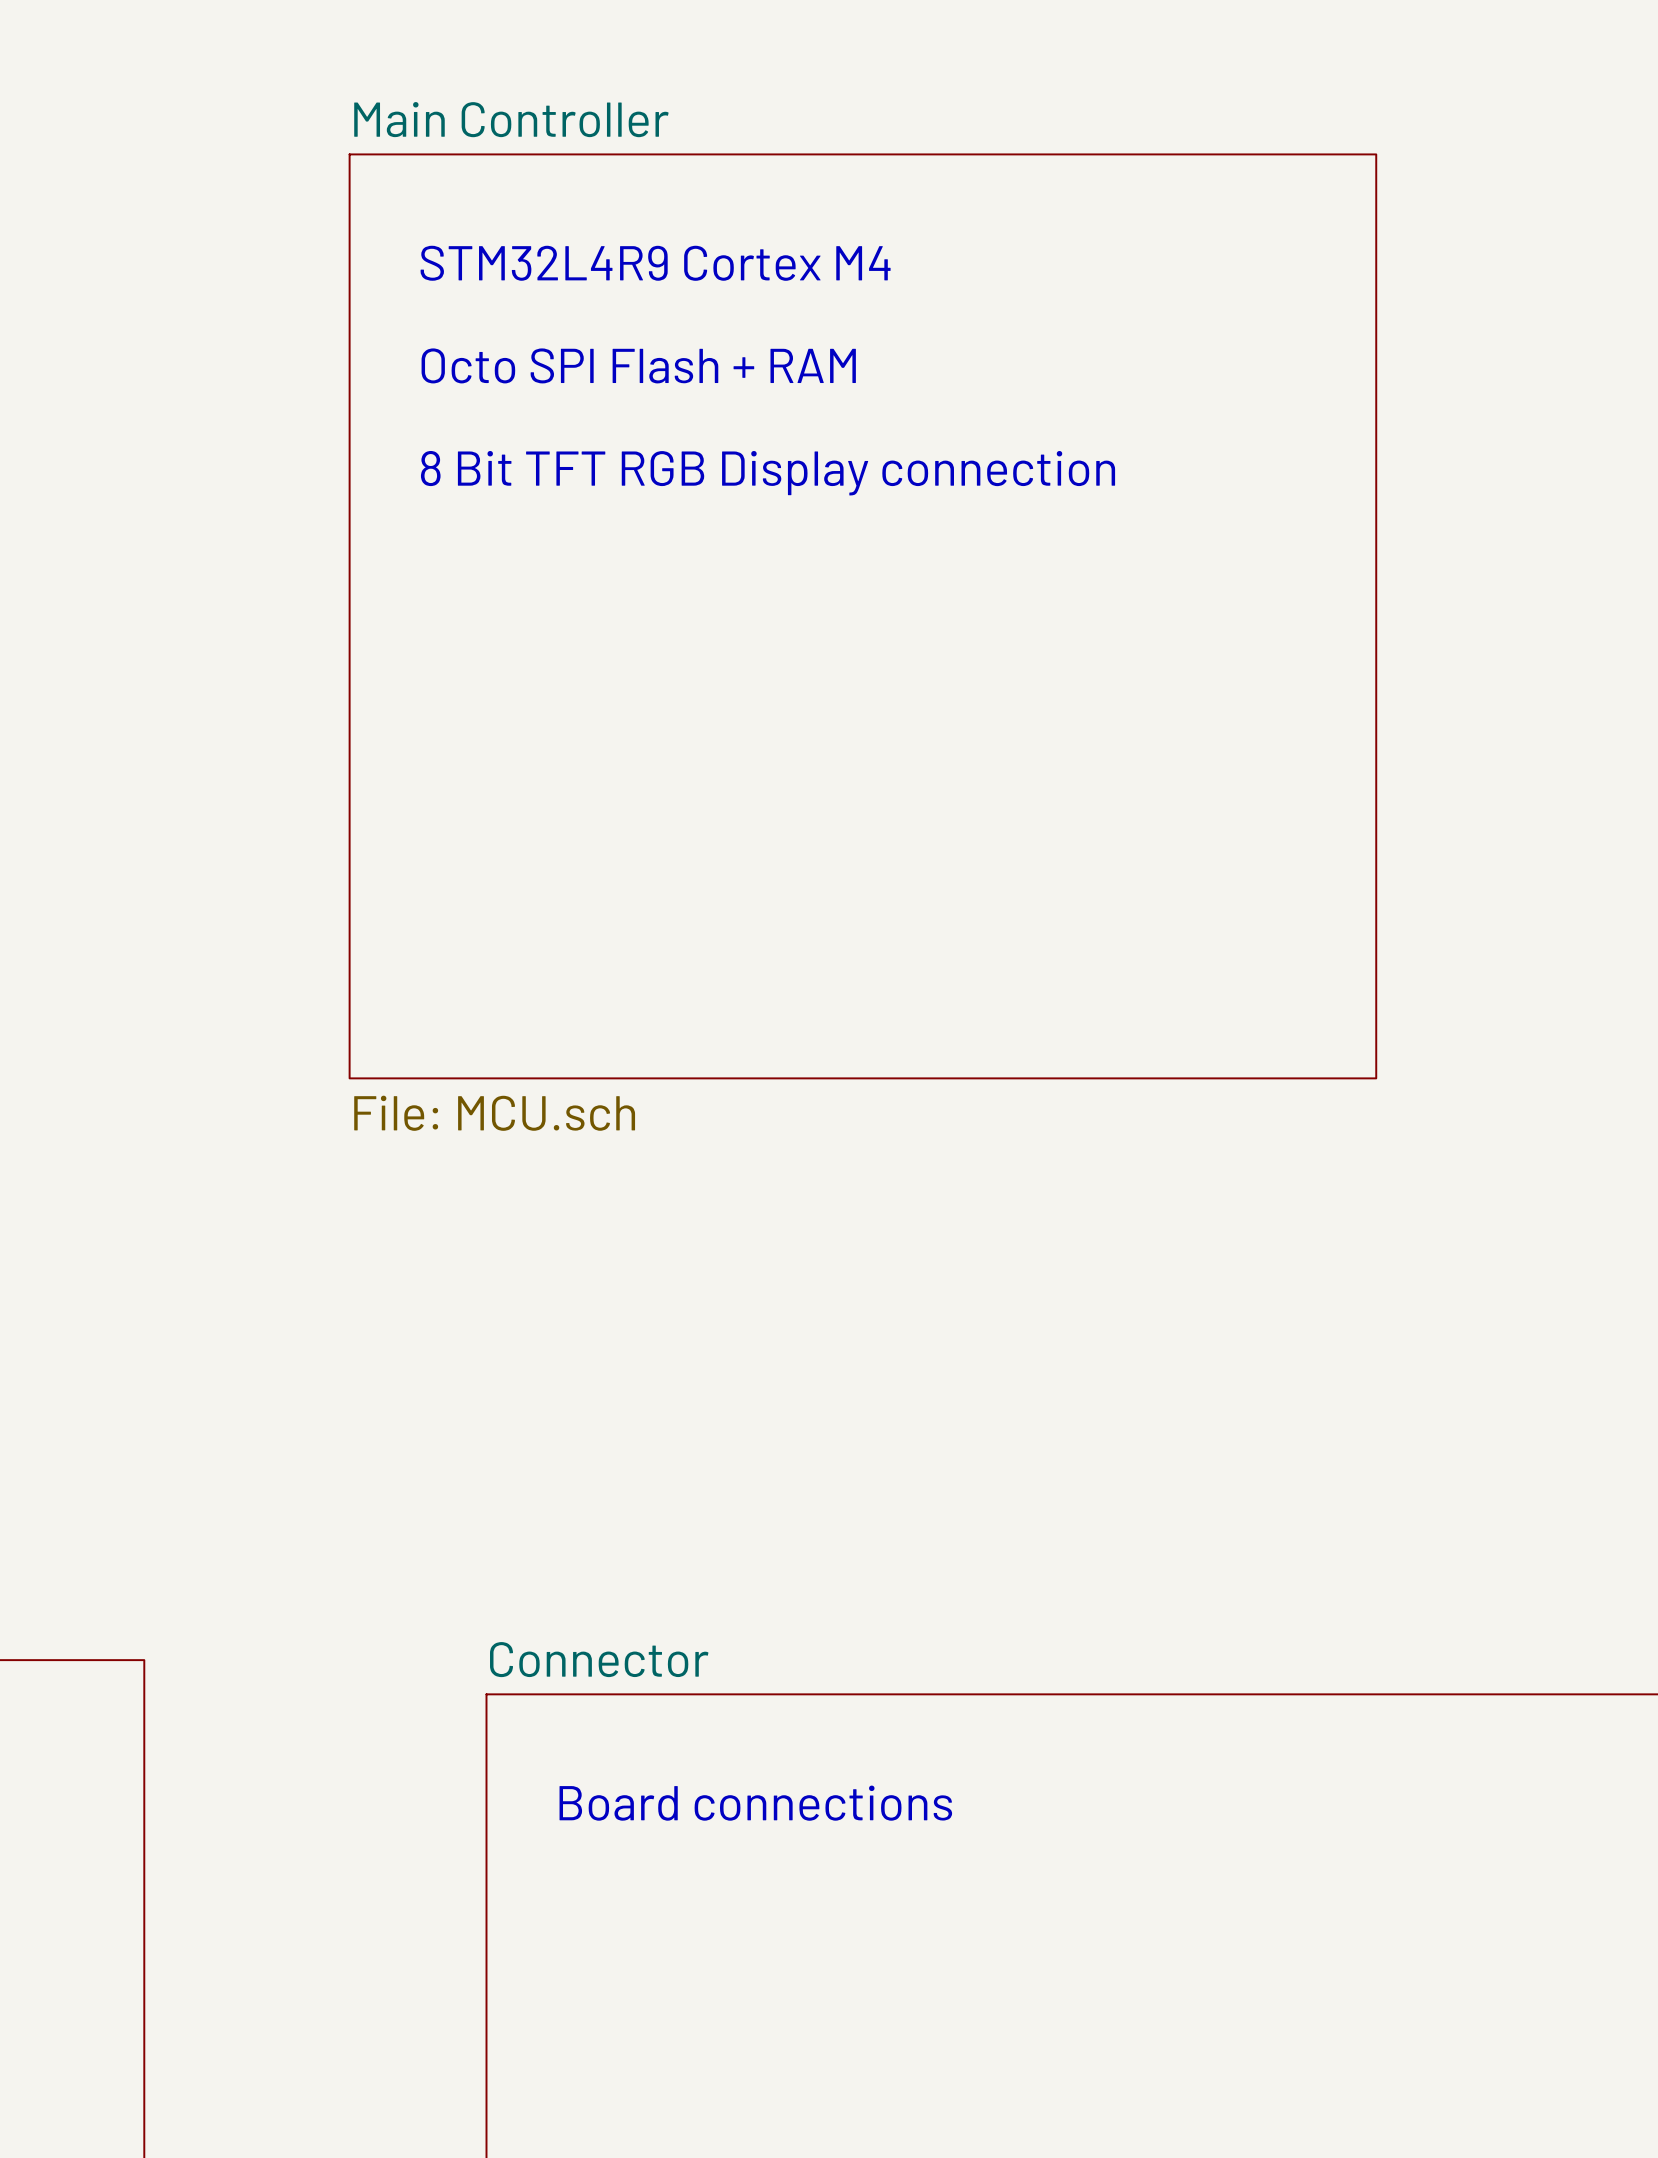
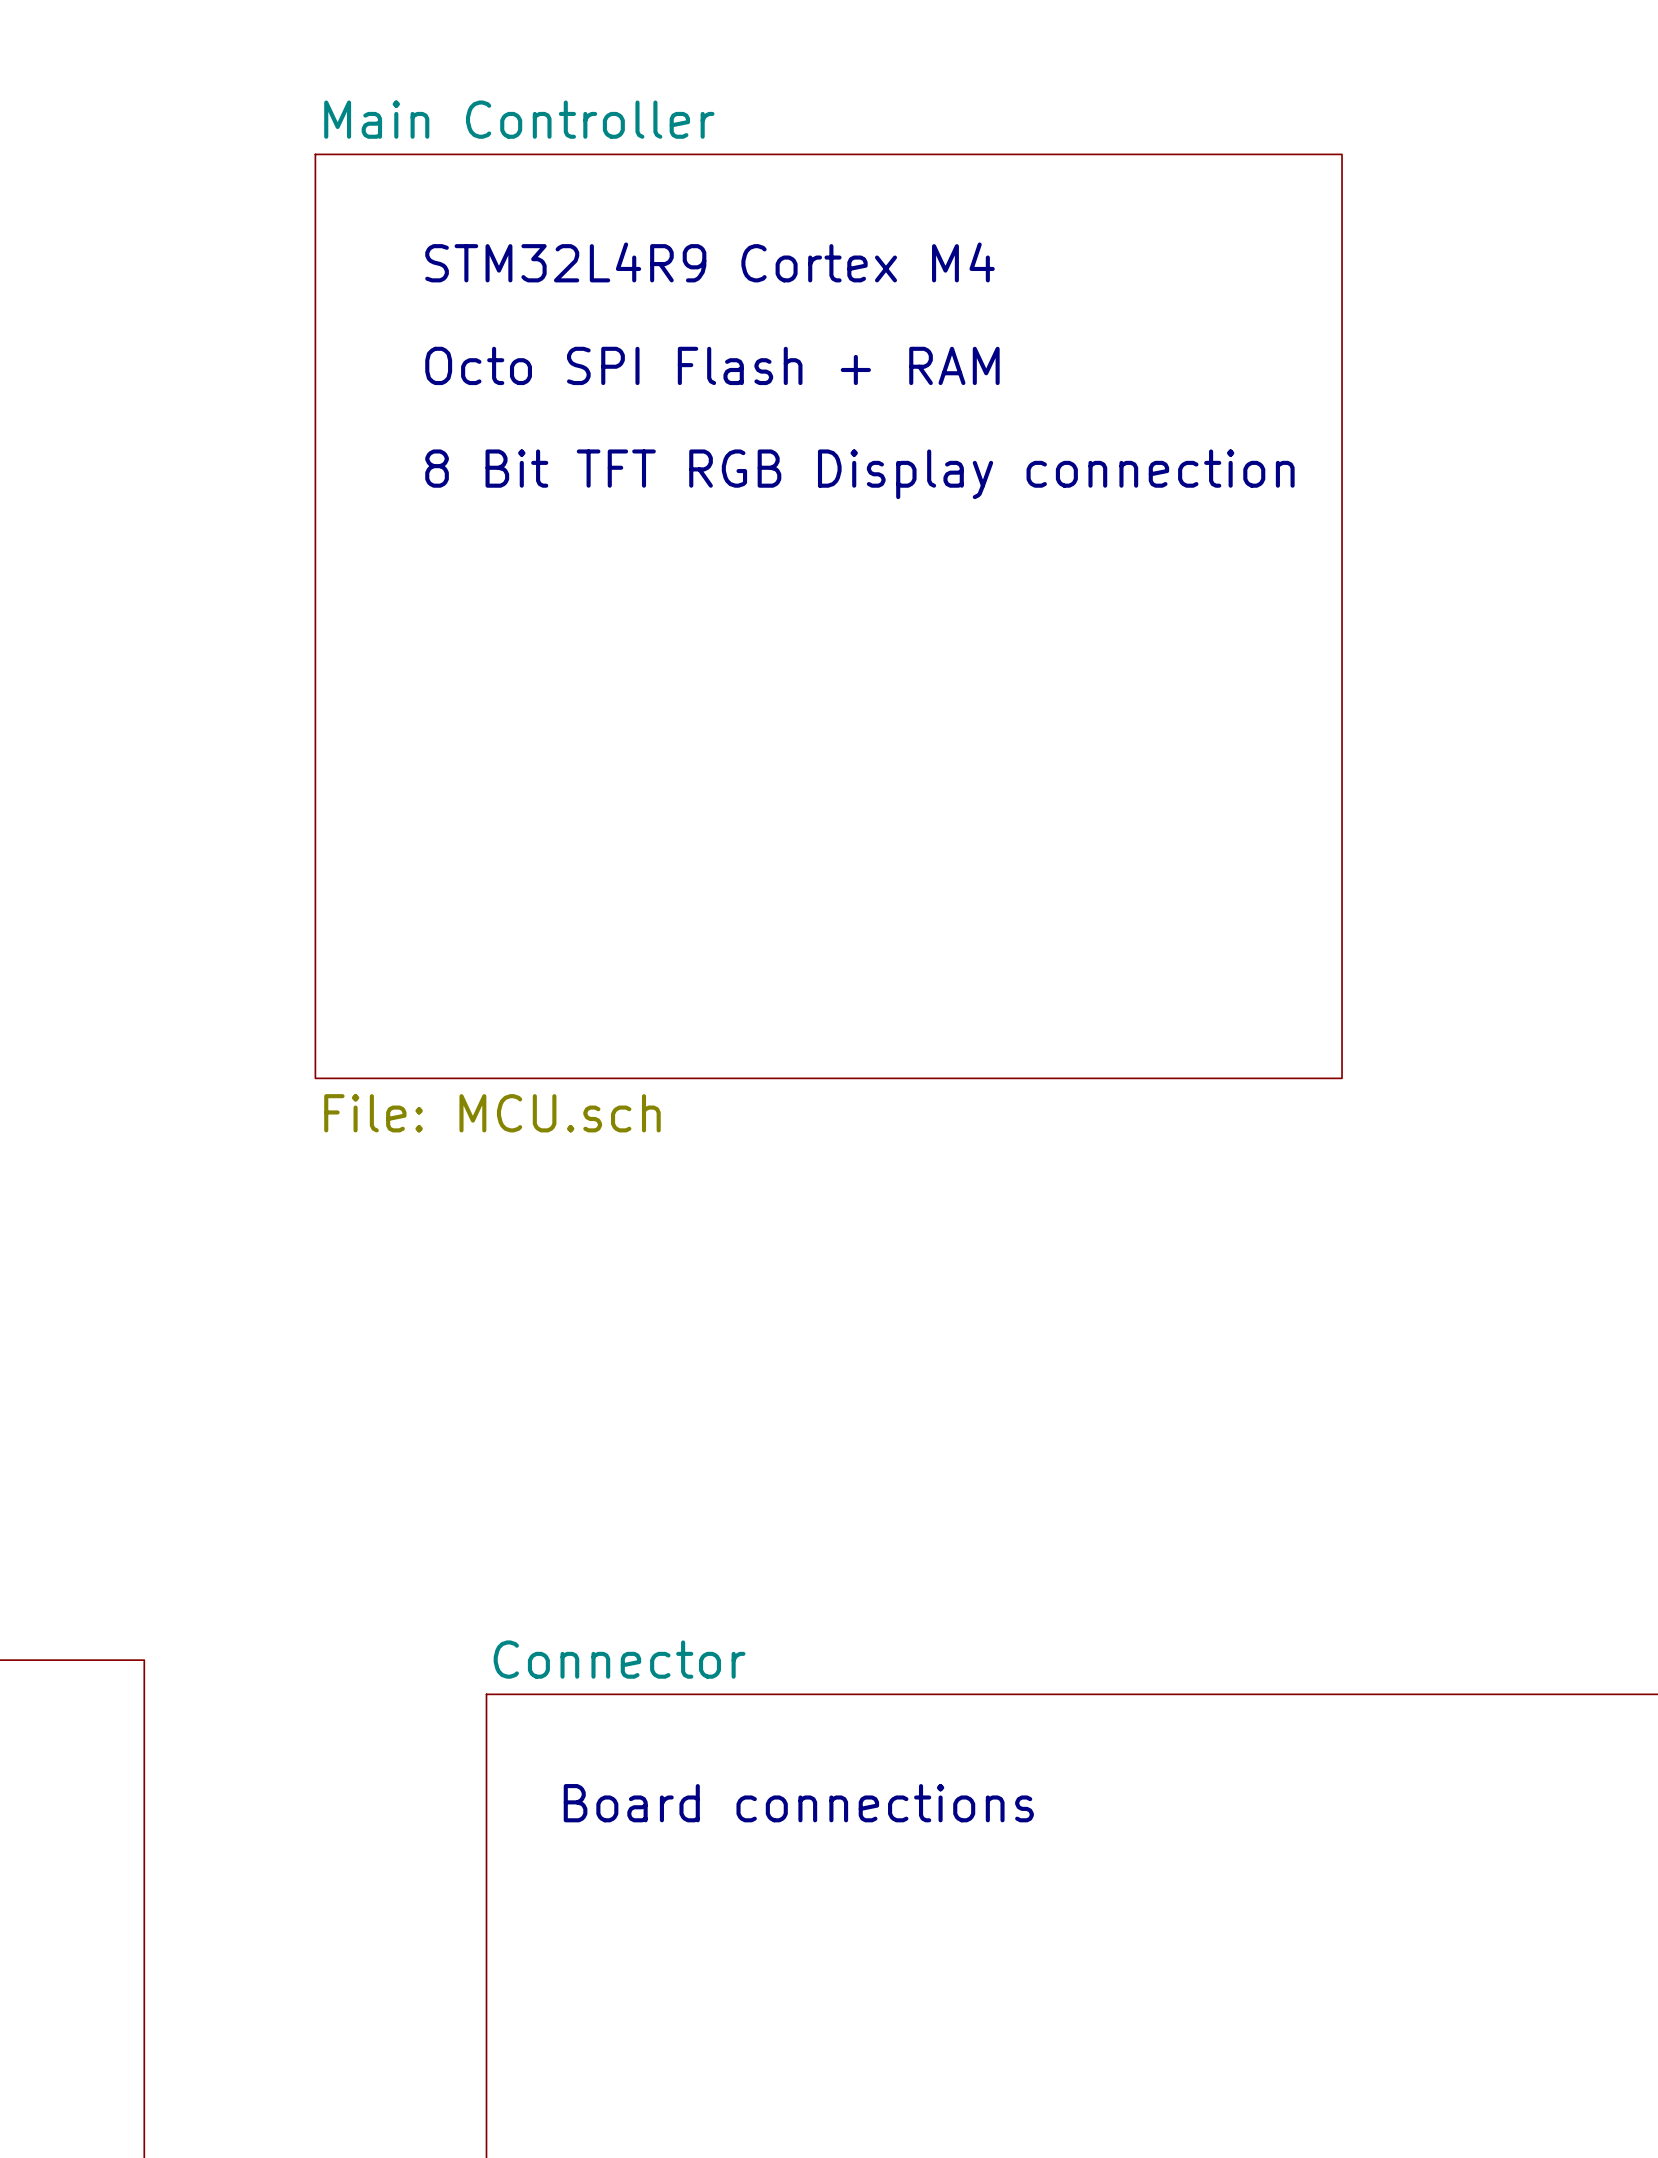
sheet Main Controller position: (862, 616) -> (828, 616)

